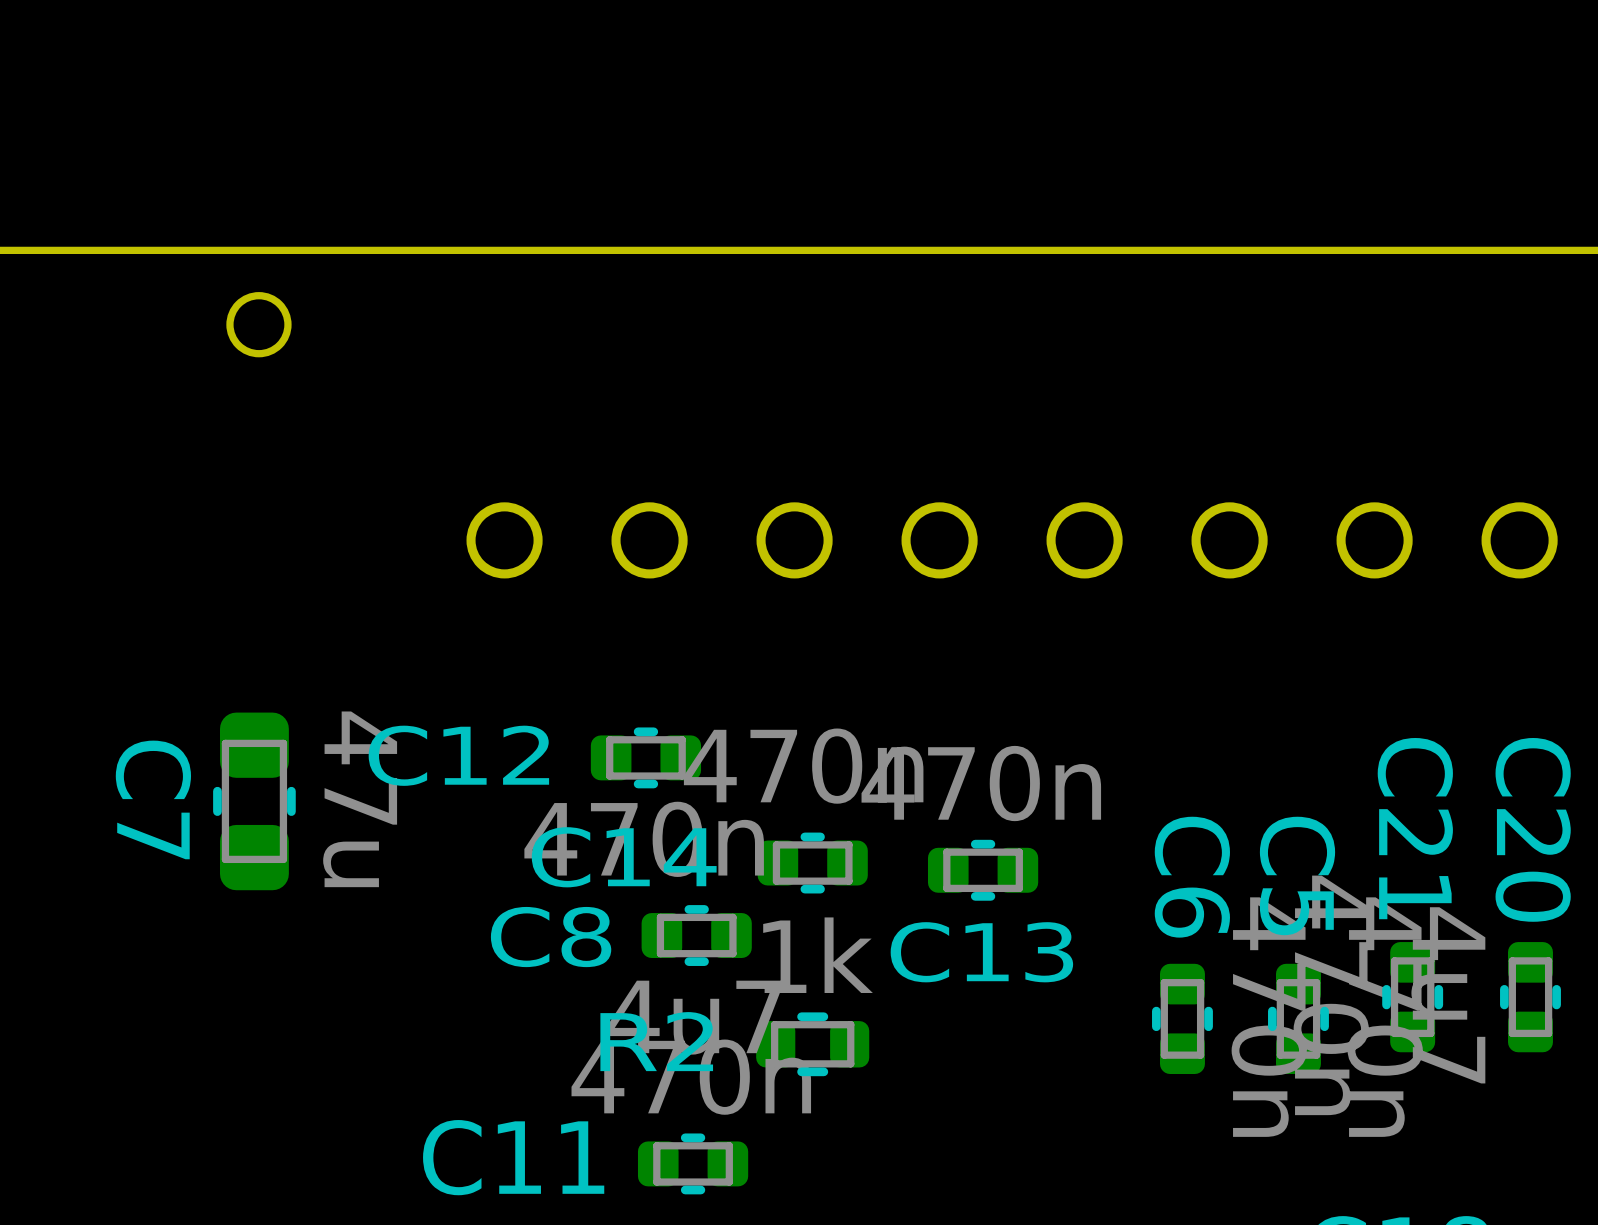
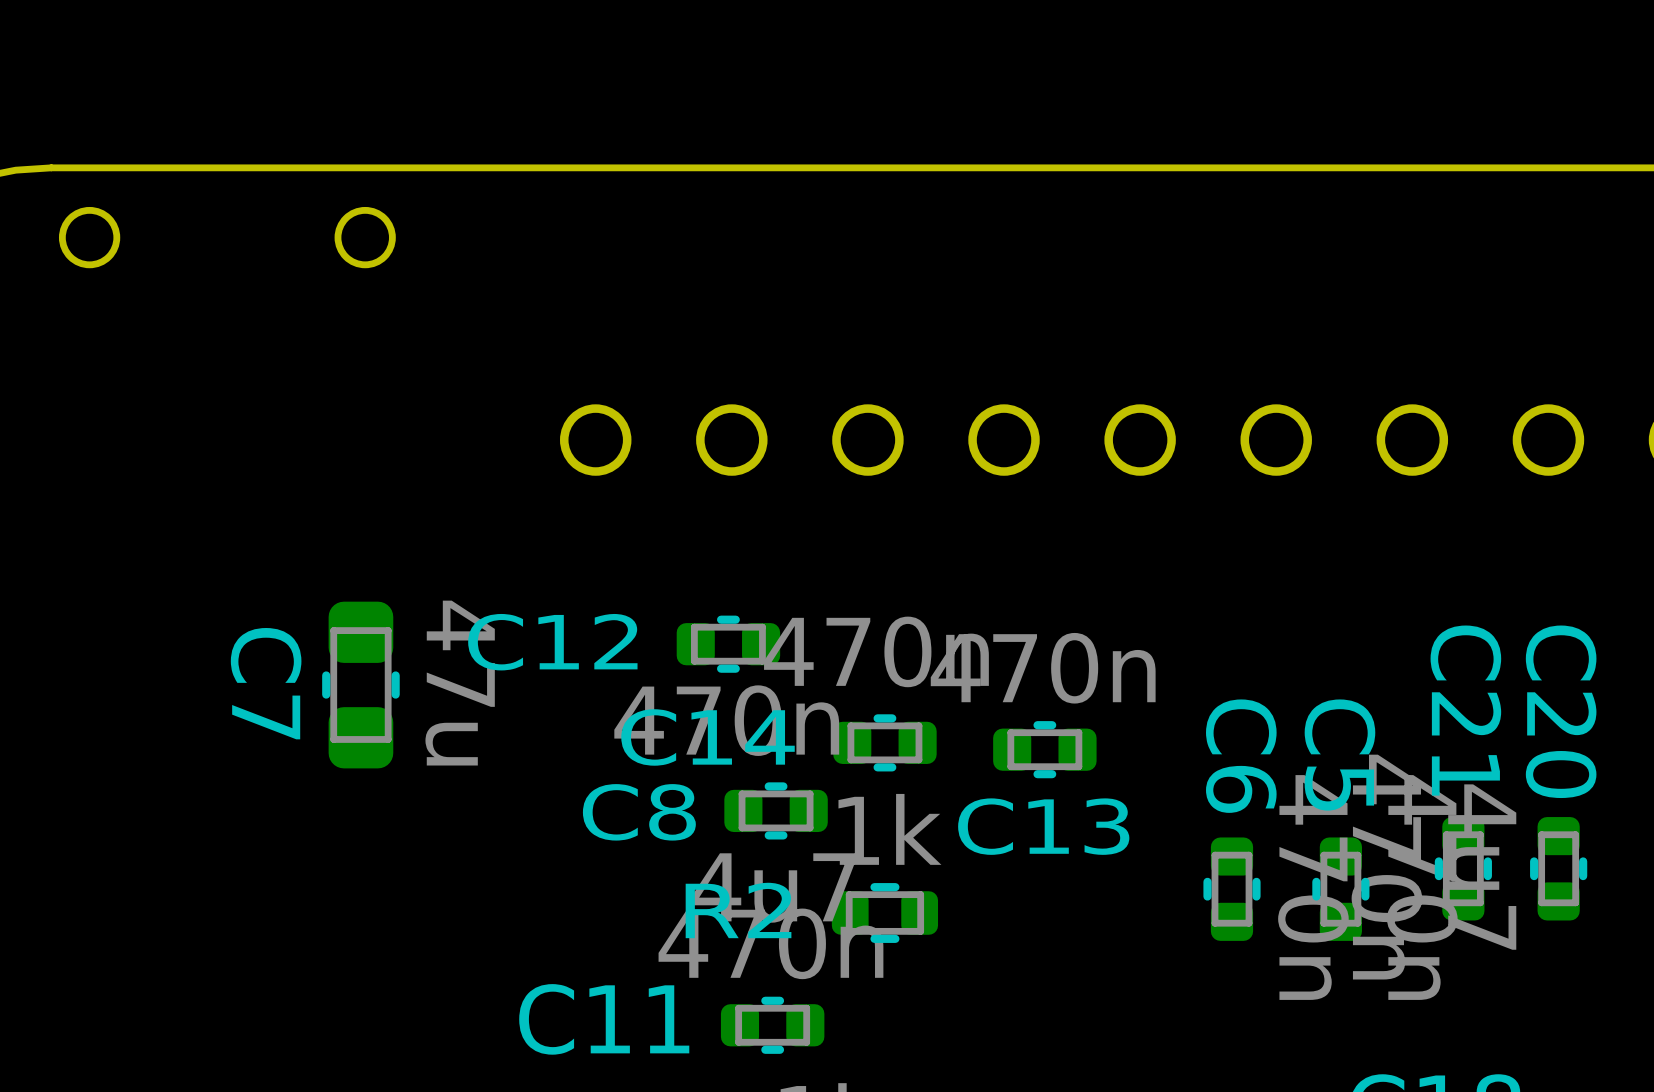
C21 position: (1412, 997) -> (1463, 868)

